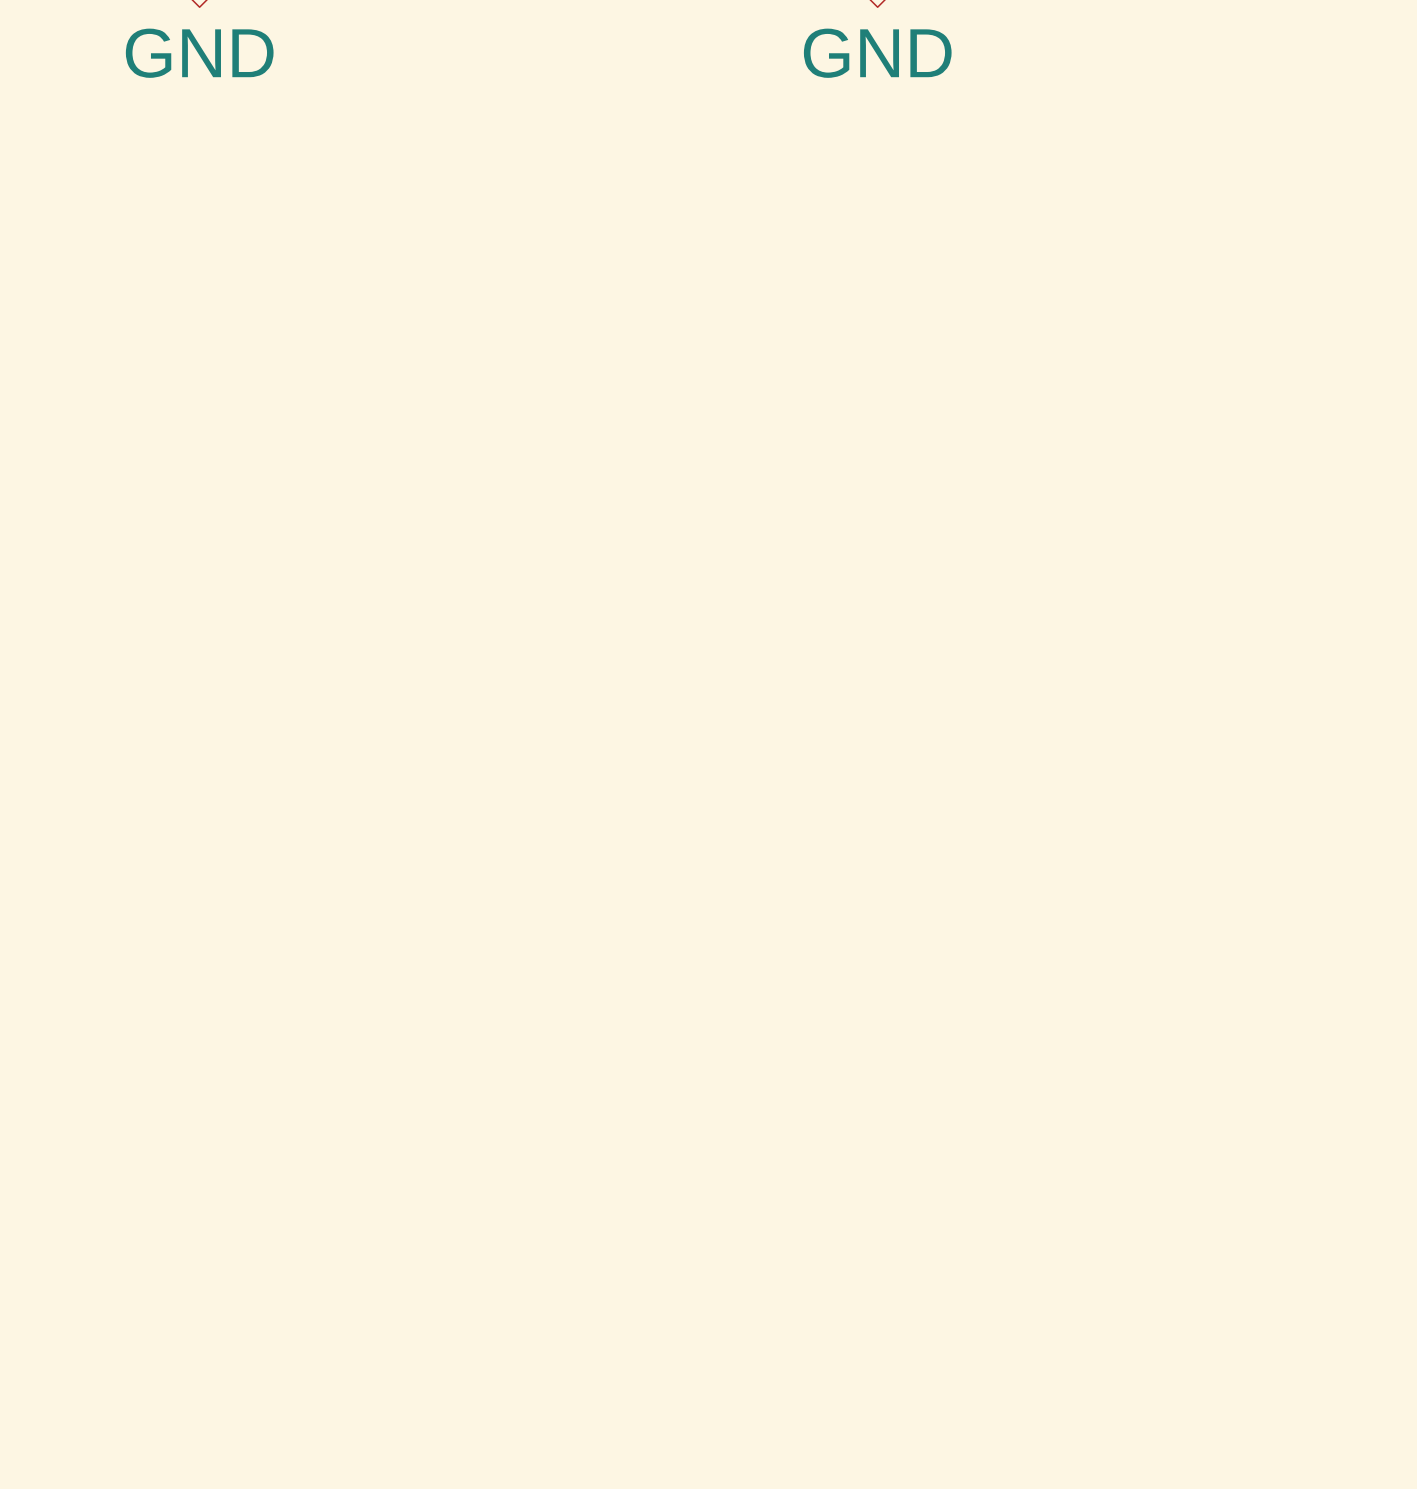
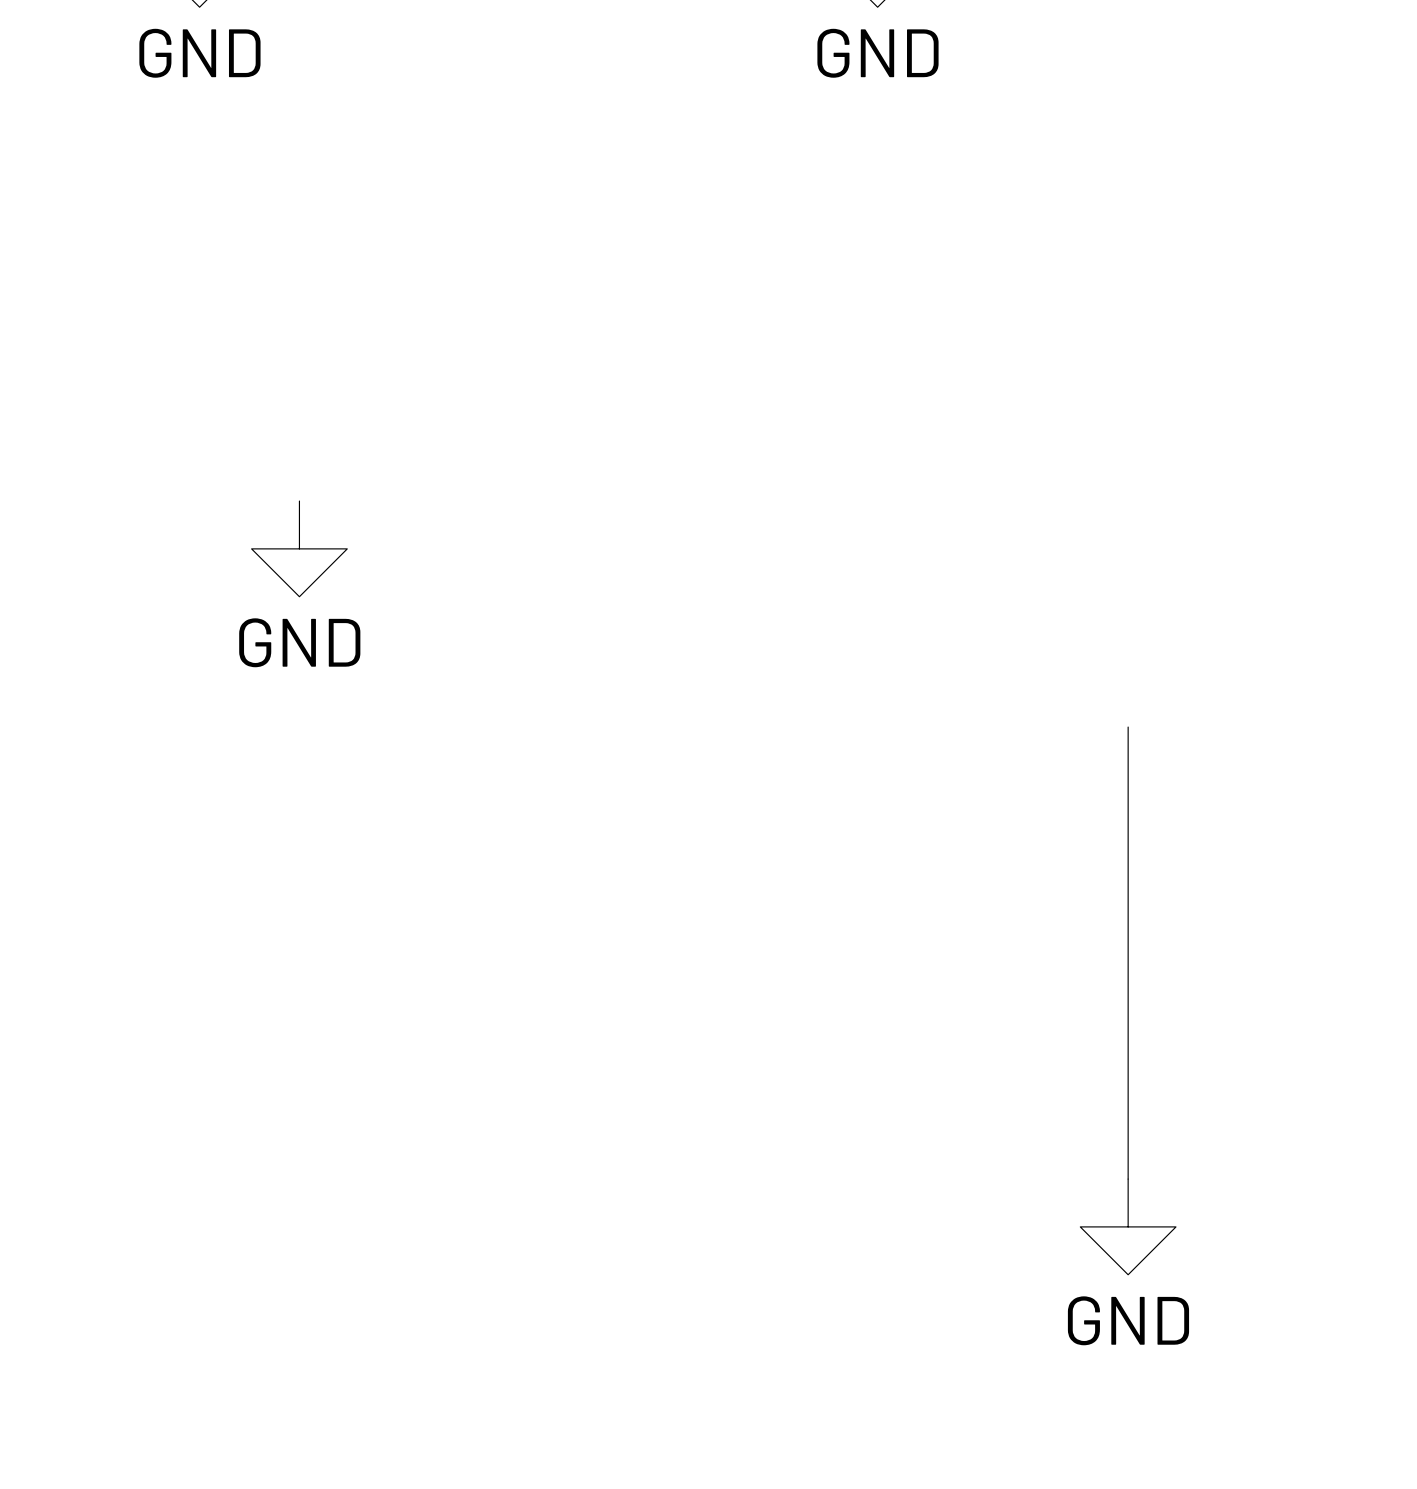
power symbol: none -> GND (299, 548)
wire: none -> (1128, 727) (1128, 1179)
power symbol: none -> GND (1128, 1226)

